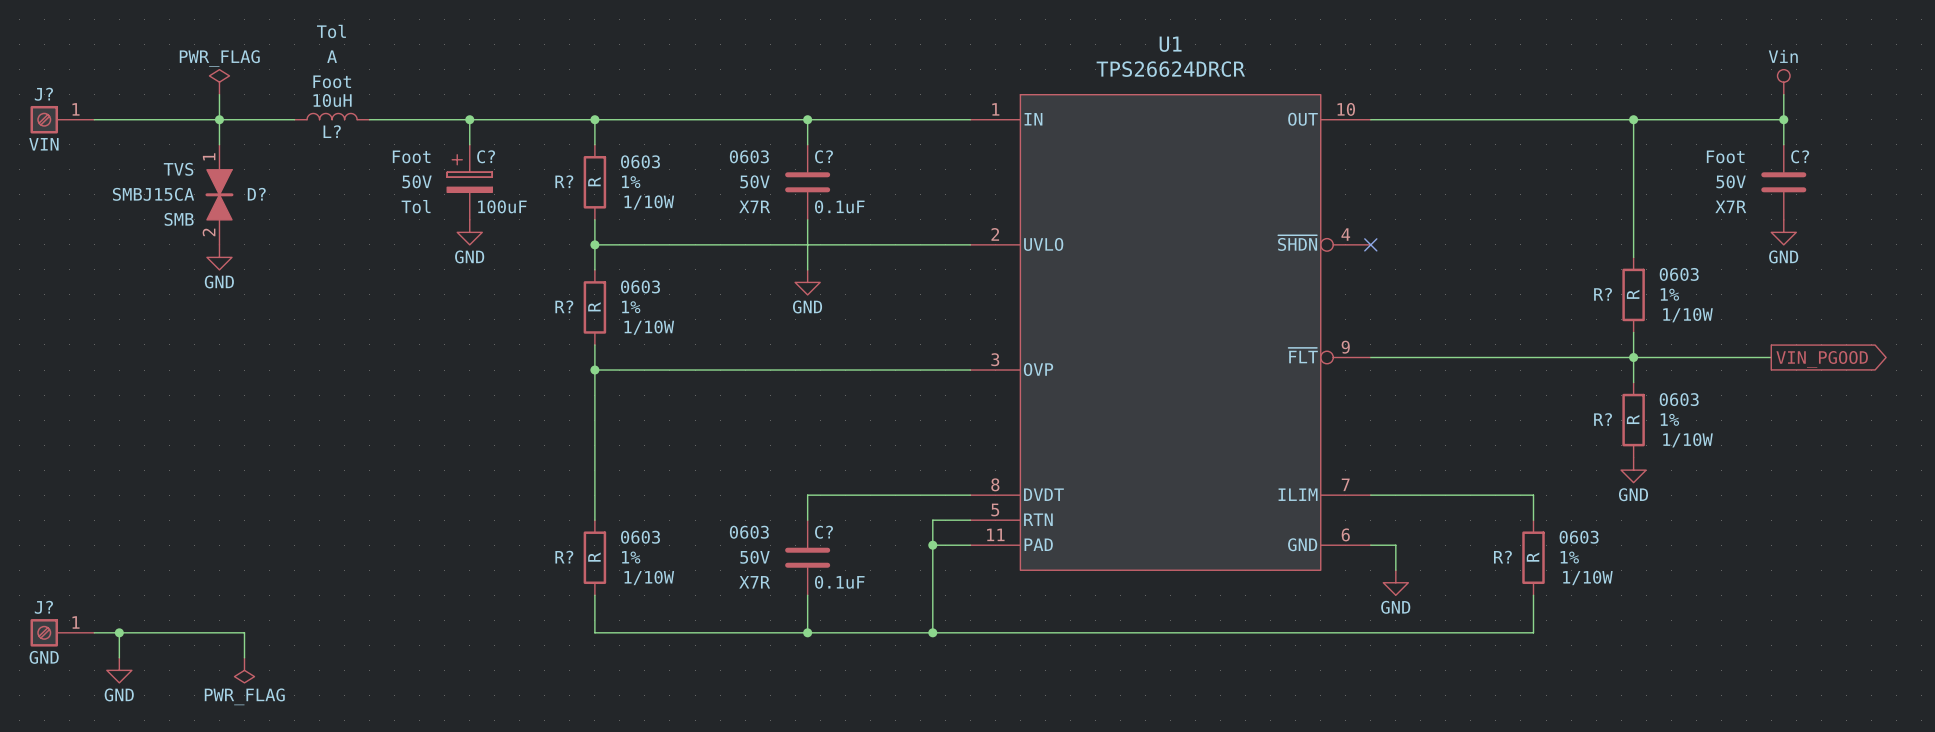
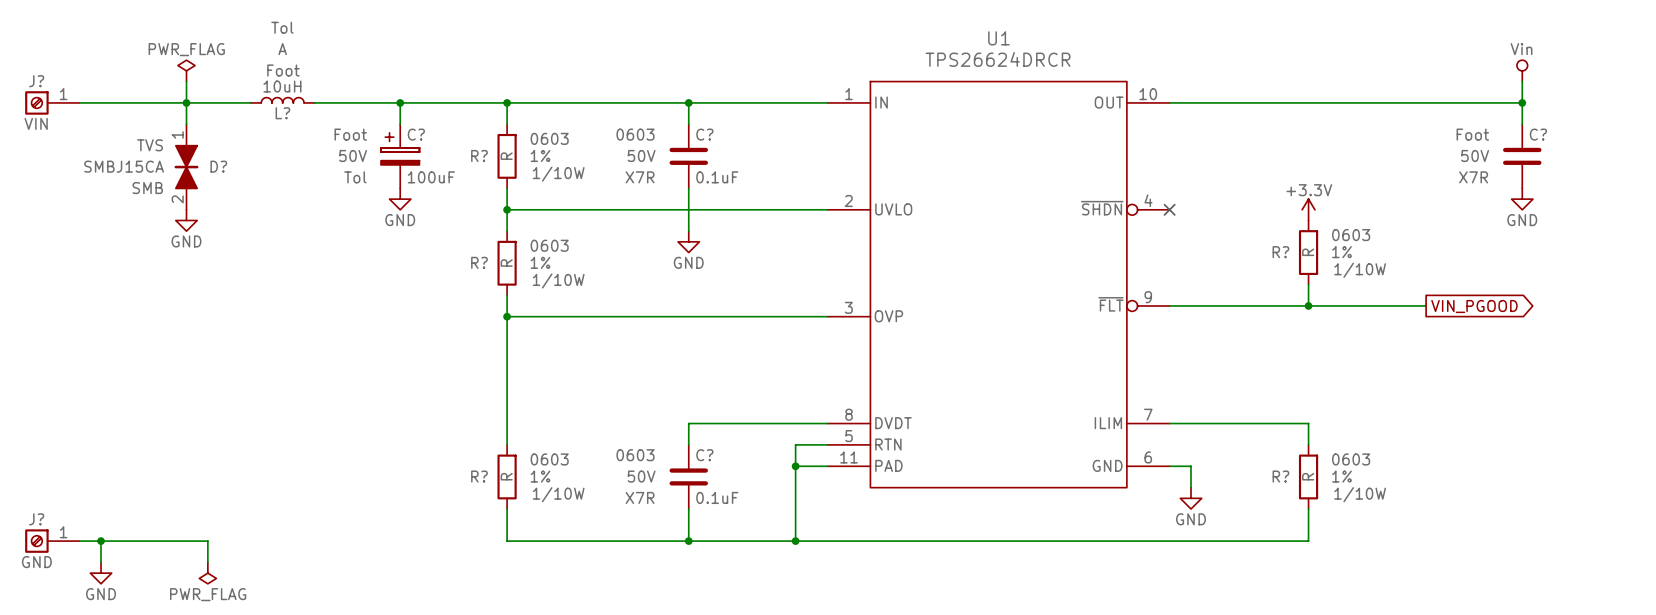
wire: (1633, 119) (1633, 257) -> none
junction: (1633, 119) -> none
power symbol: none -> +3.3V (1308, 209)
R?: none -> R (1308, 252)
R?: R (1633, 294) -> none
wire: none -> (1308, 284) (1308, 305)
wire: (1633, 332) (1633, 382) -> none
junction: none -> (1308, 305)
junction: (1633, 357) -> none
wire: (1671, 357) (1771, 357) -> none
global label position: VIN_PGOOD (1822, 359) -> VIN_PGOOD (1474, 306)
R?: R (1633, 420) -> none
power symbol: GND (1633, 470) -> none

